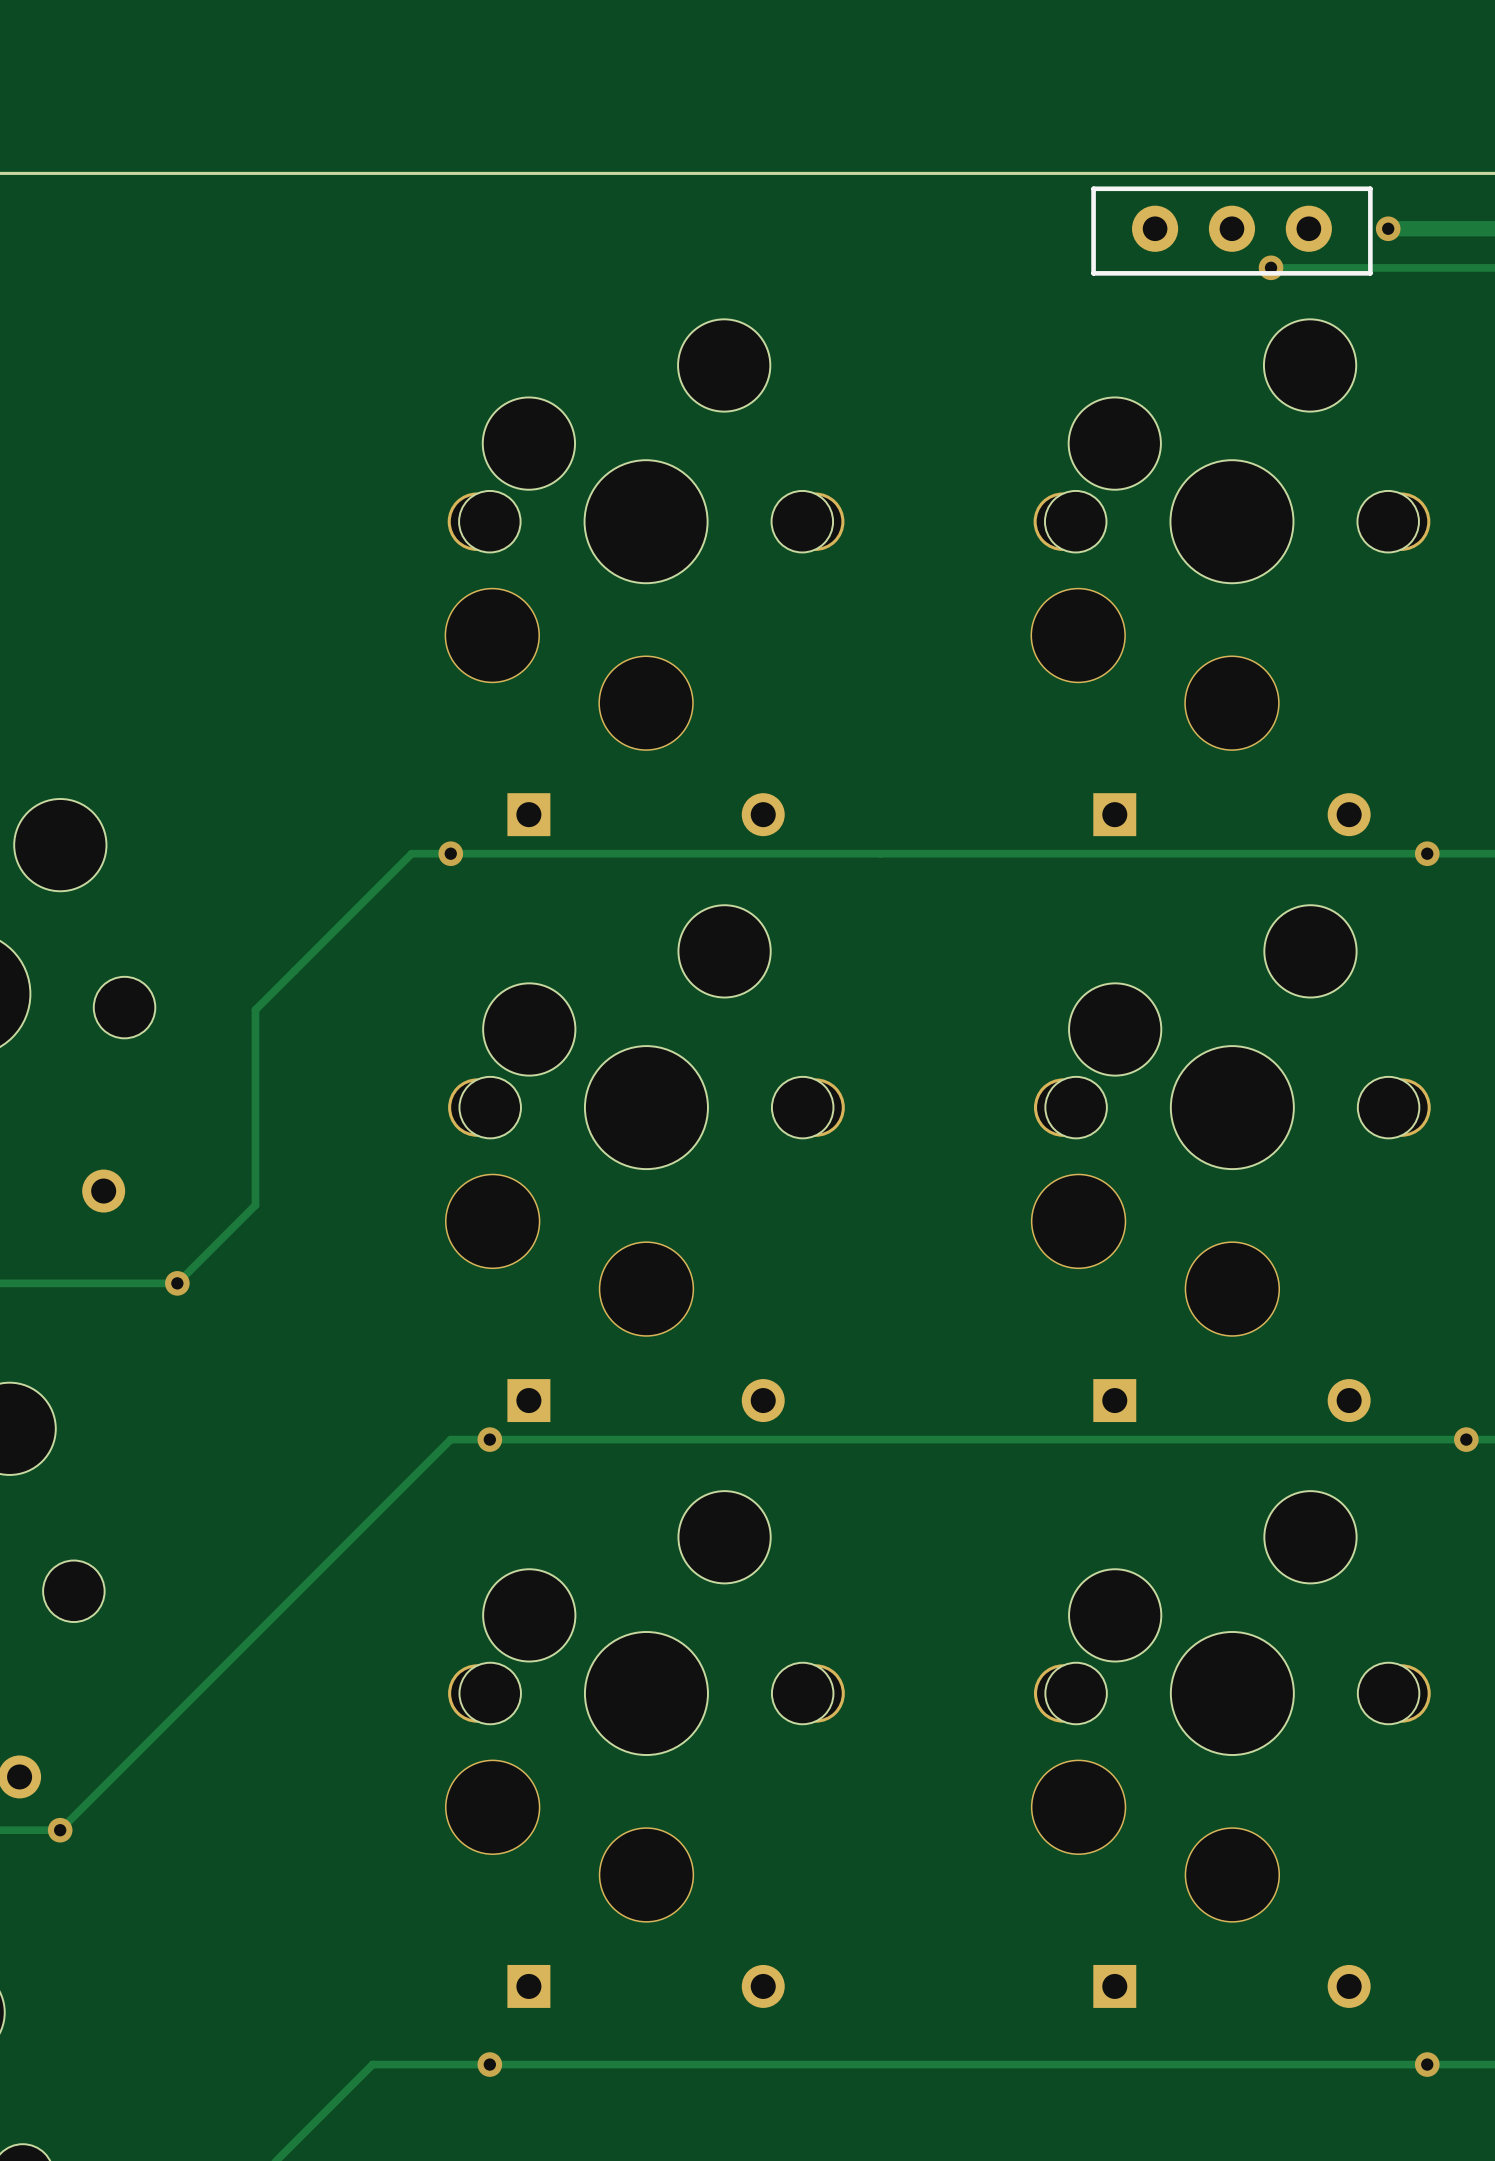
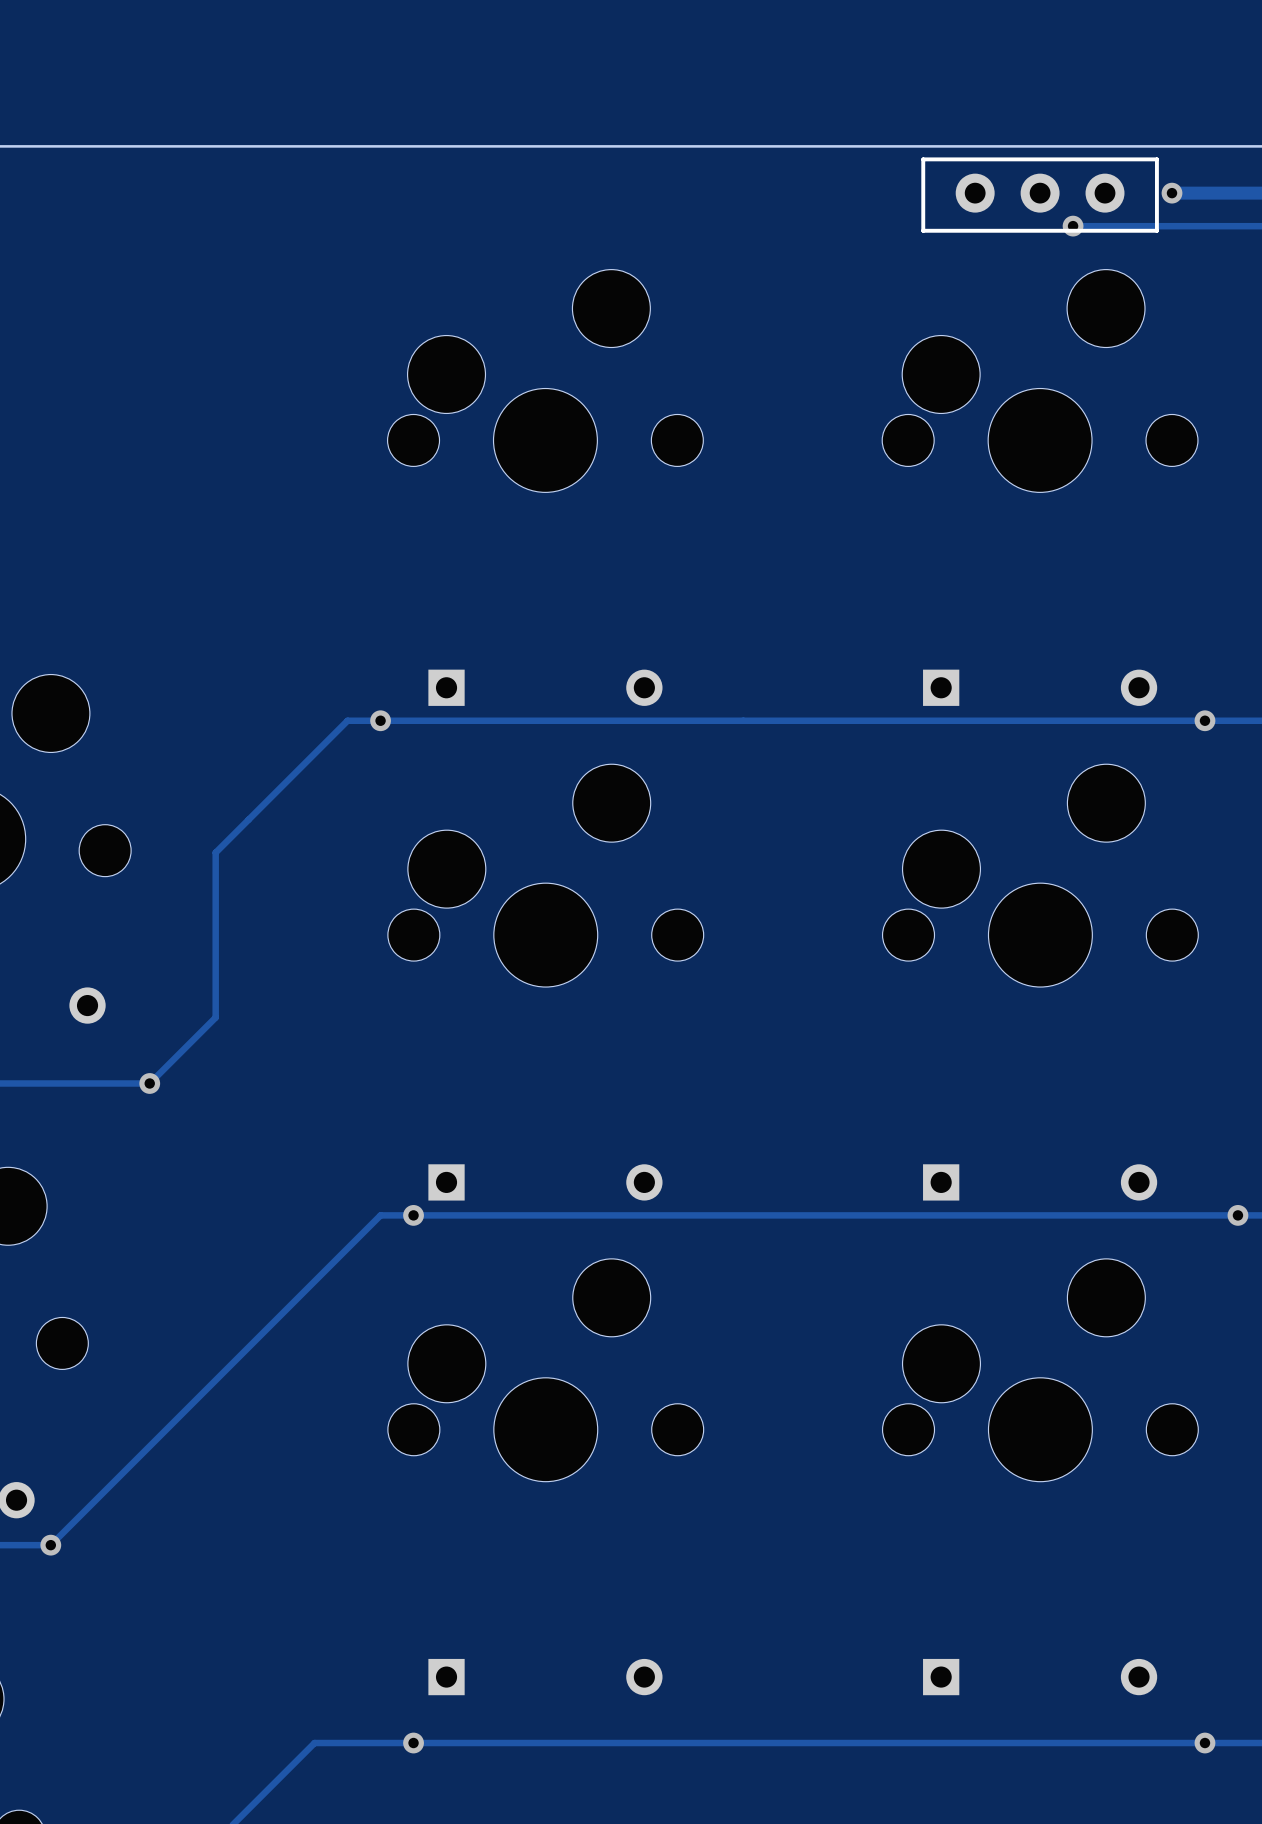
part: none -> (545, 380)
part: none -> (1040, 380)
part: (644, 535) -> none
part: (1230, 535) -> none
part: none -> (545, 875)
part: none -> (1040, 875)
part: (644, 1120) -> none
part: (1230, 1120) -> none
part: none -> (545, 1370)
part: none -> (1040, 1370)
part: (644, 1706) -> none
part: (1230, 1706) -> none

